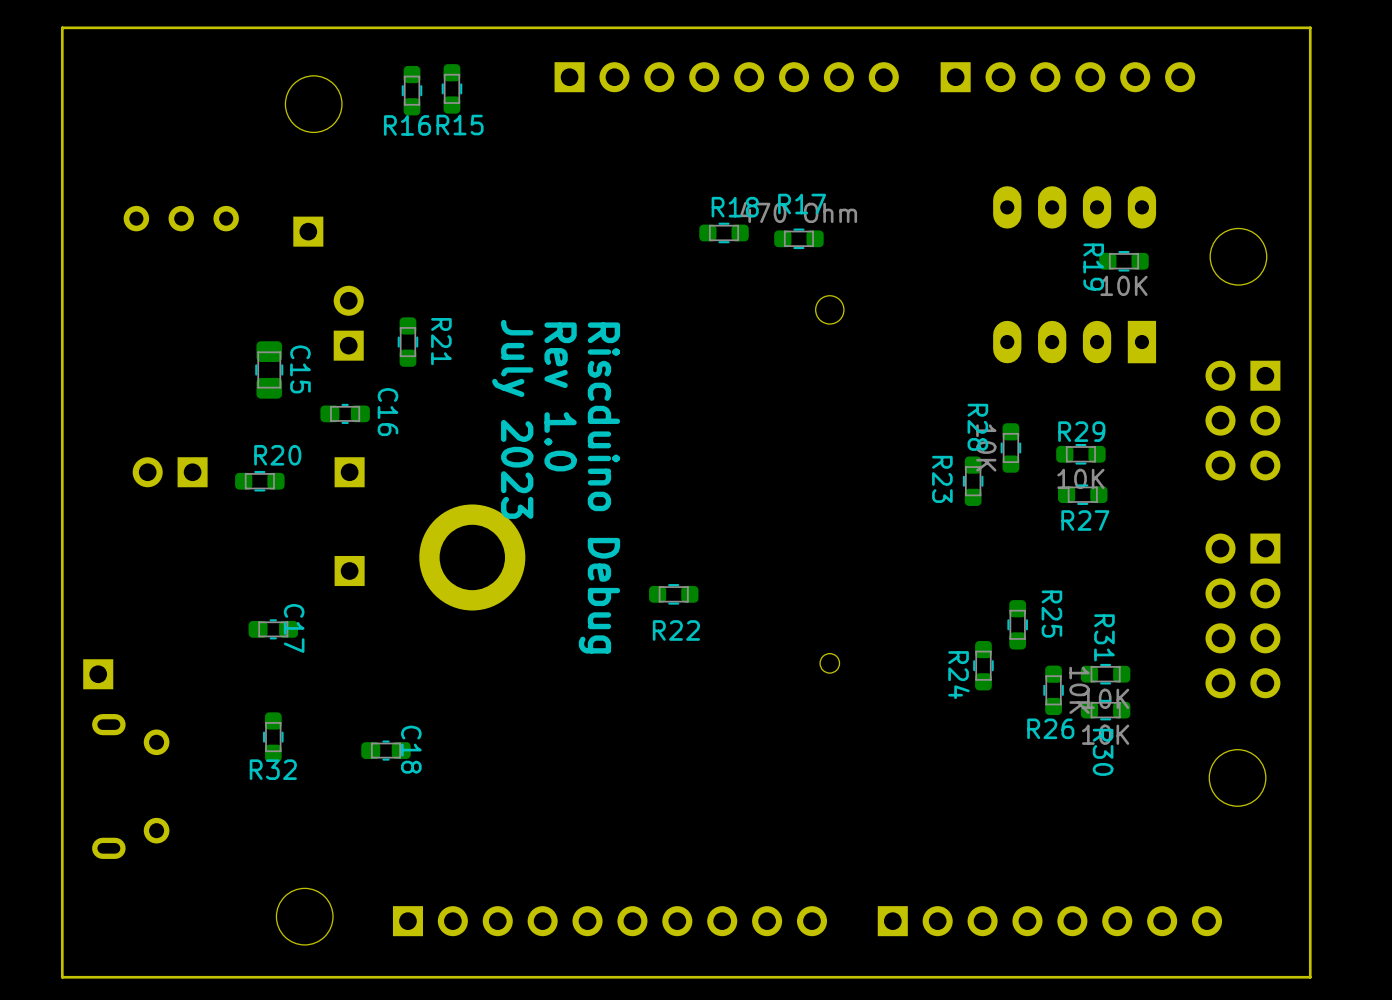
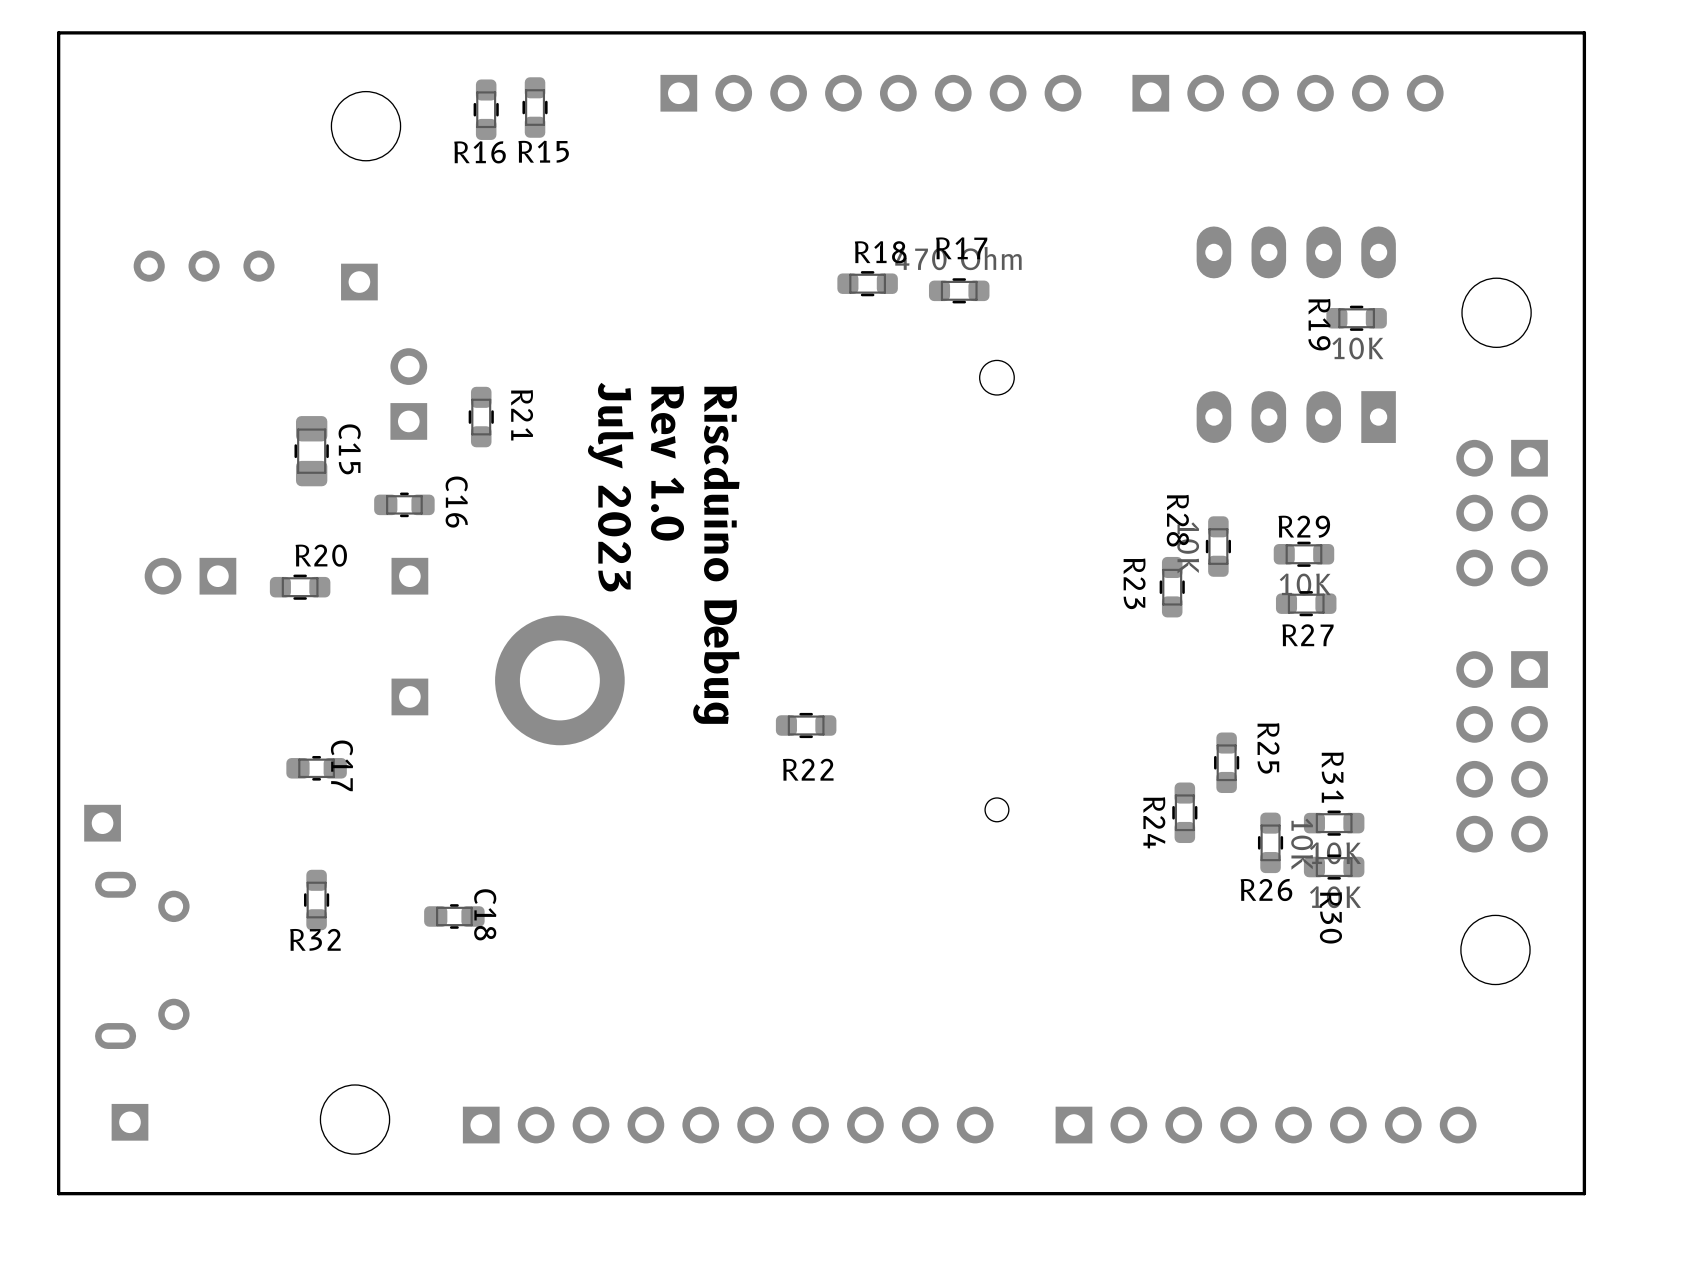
part: none -> (129, 1122)

